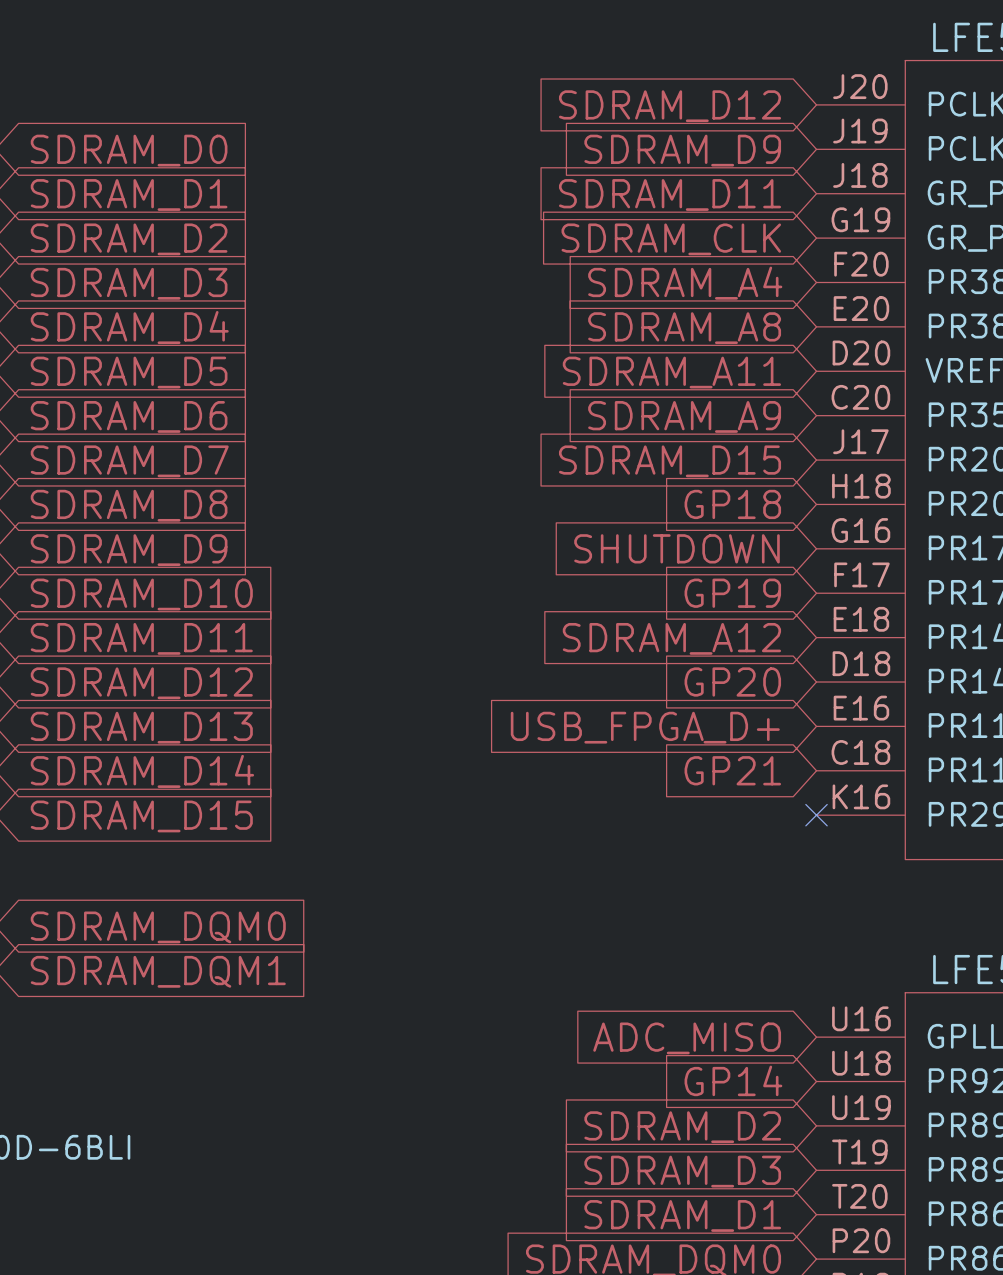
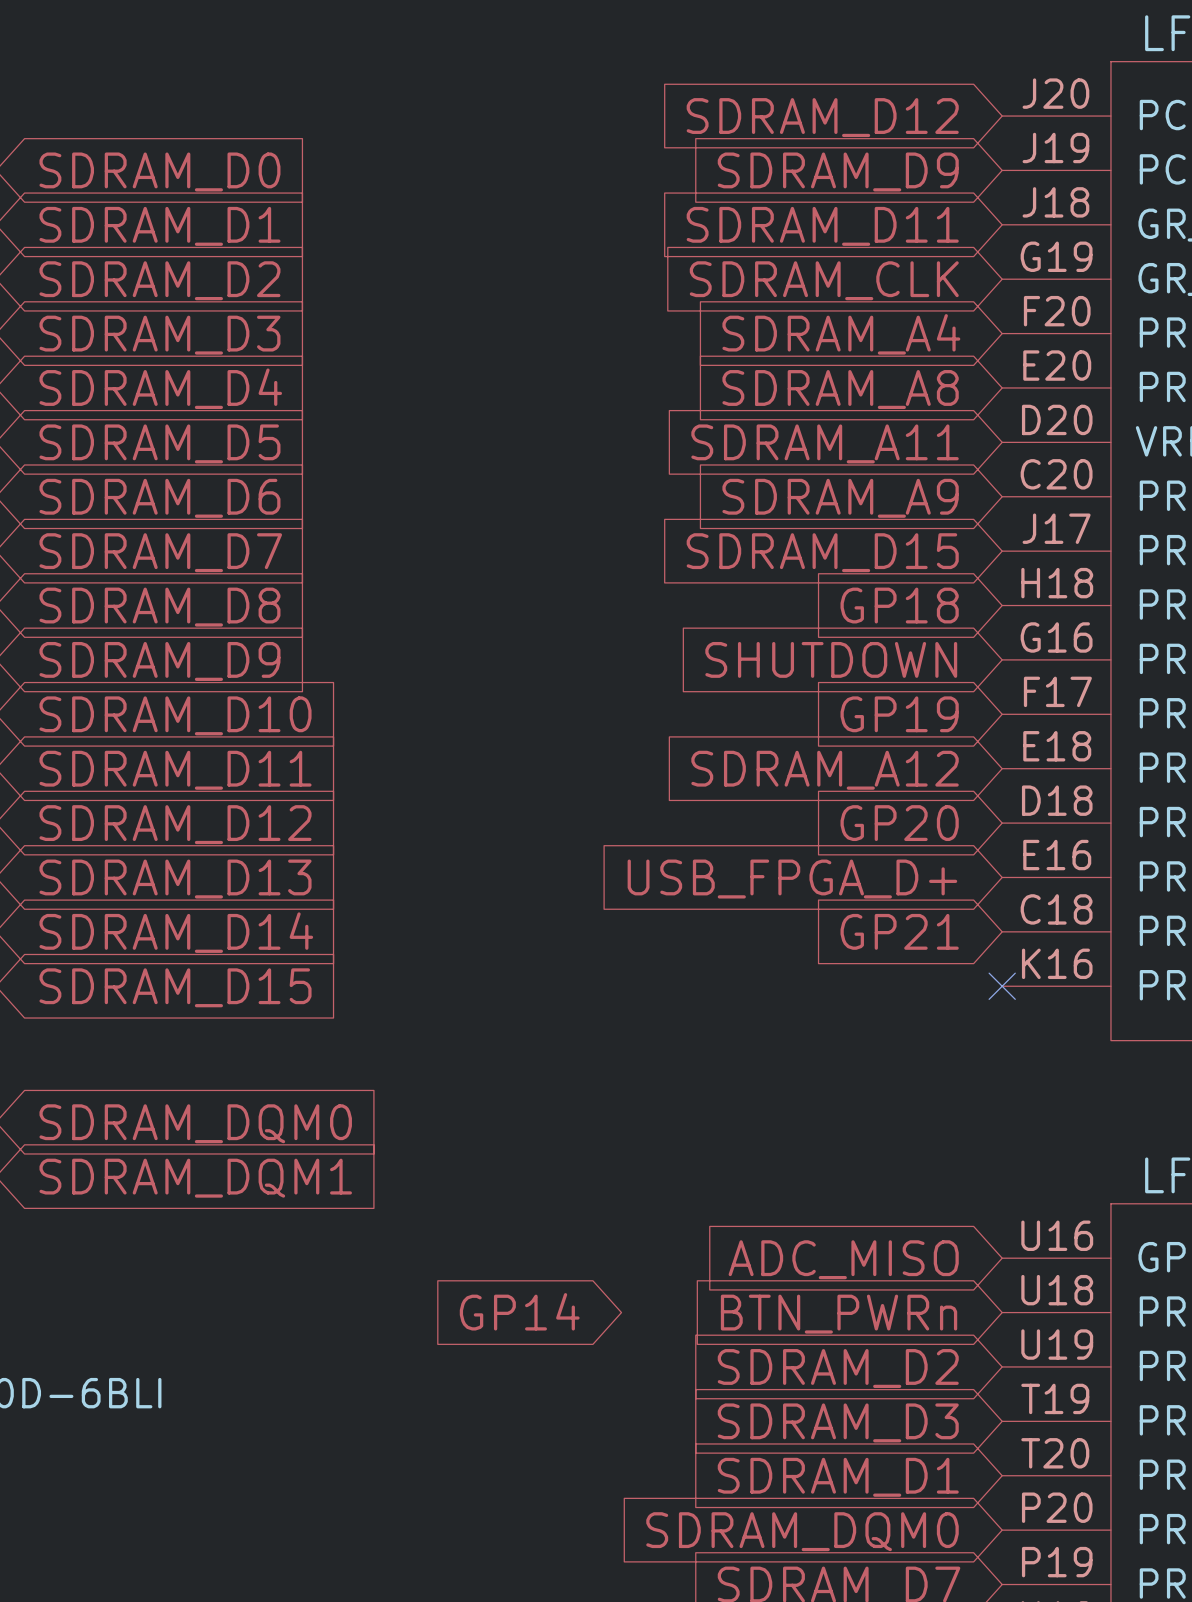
global label: none -> GP14 (519, 1311)
global label: GP14 (733, 1080) -> BTN_PWRn (839, 1314)

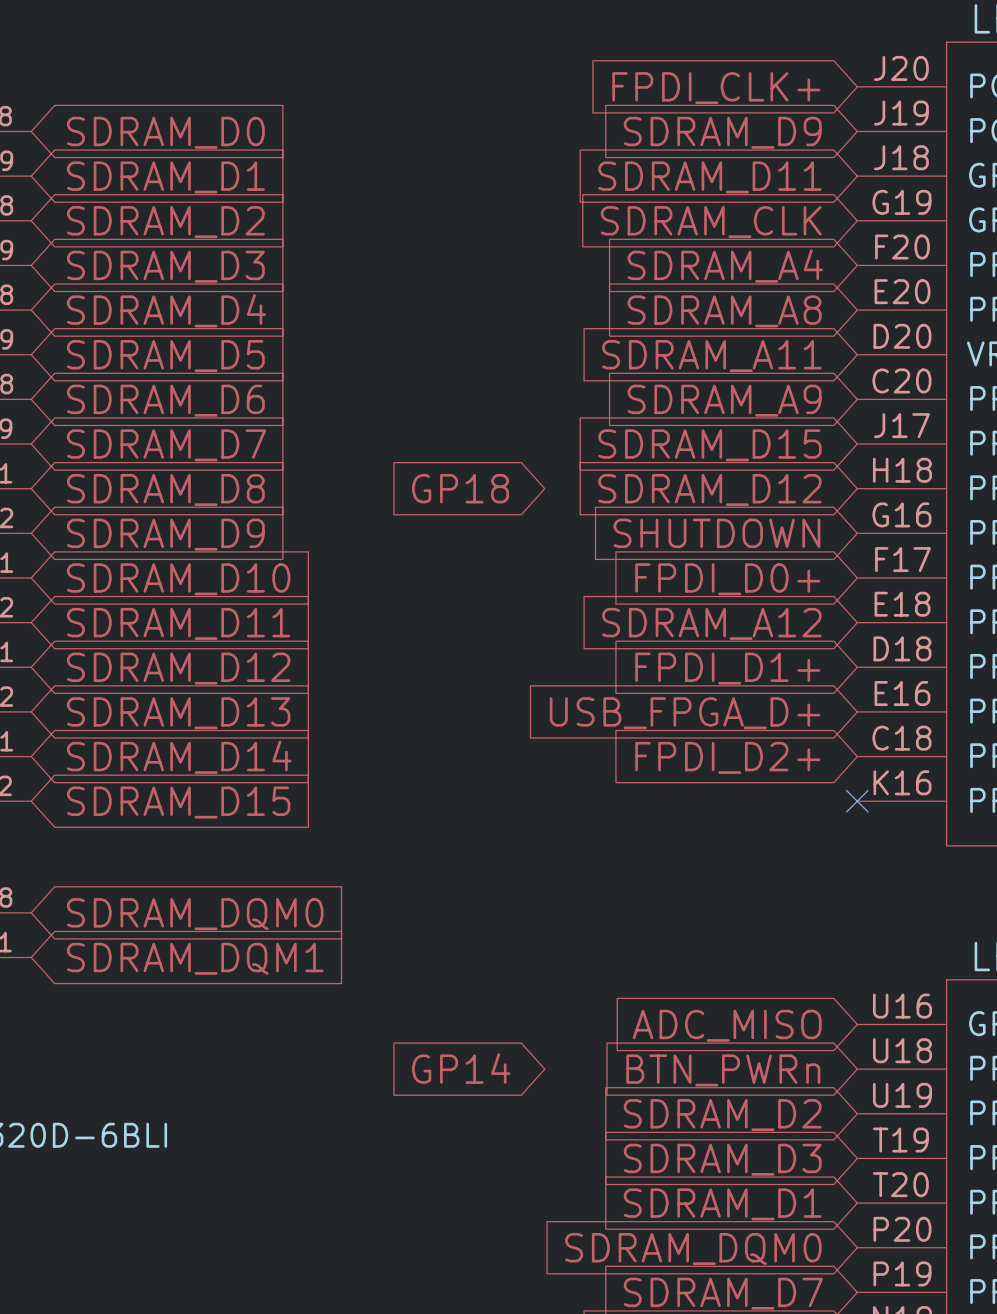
global label: SDRAM_D12 (822, 117) -> FPDI_CLK+ (716, 88)
global label: none -> GP18 (460, 488)
global label: GP18 (899, 605) -> SDRAM_D12 (709, 489)
global label: GP19 (899, 714) -> FPDI_D0+ (727, 579)
global label: GP20 (899, 823) -> FPDI_D1+ (727, 668)
global label: GP21 (899, 931) -> FPDI_D2+ (727, 757)

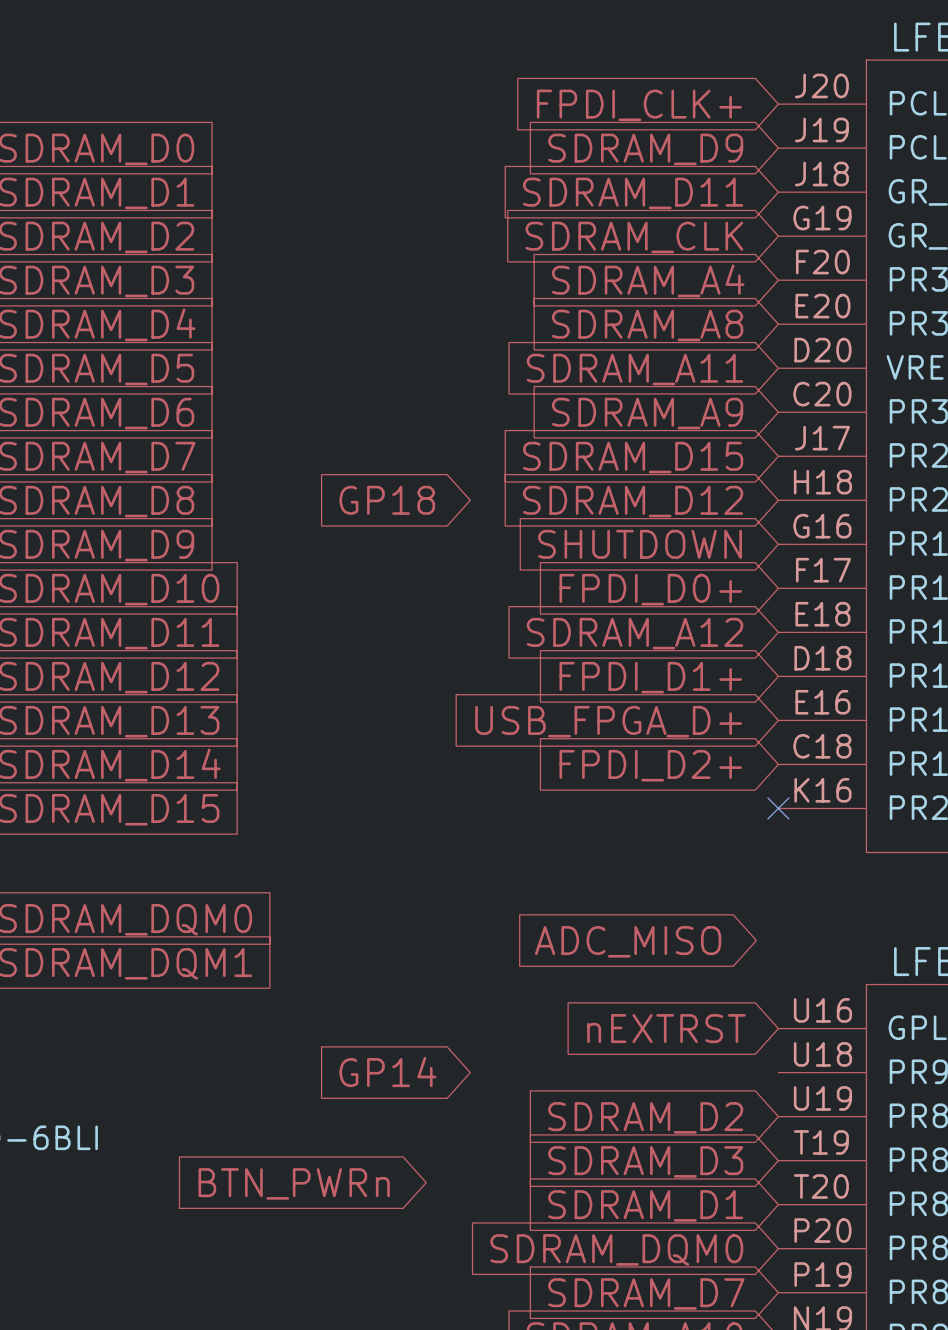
global label: none -> ADC_MISO (628, 941)
global label: ADC_MISO (727, 1025) -> nEXTRST (666, 1028)
global label position: BTN_PWRn (723, 1070) -> BTN_PWRn (294, 1183)

